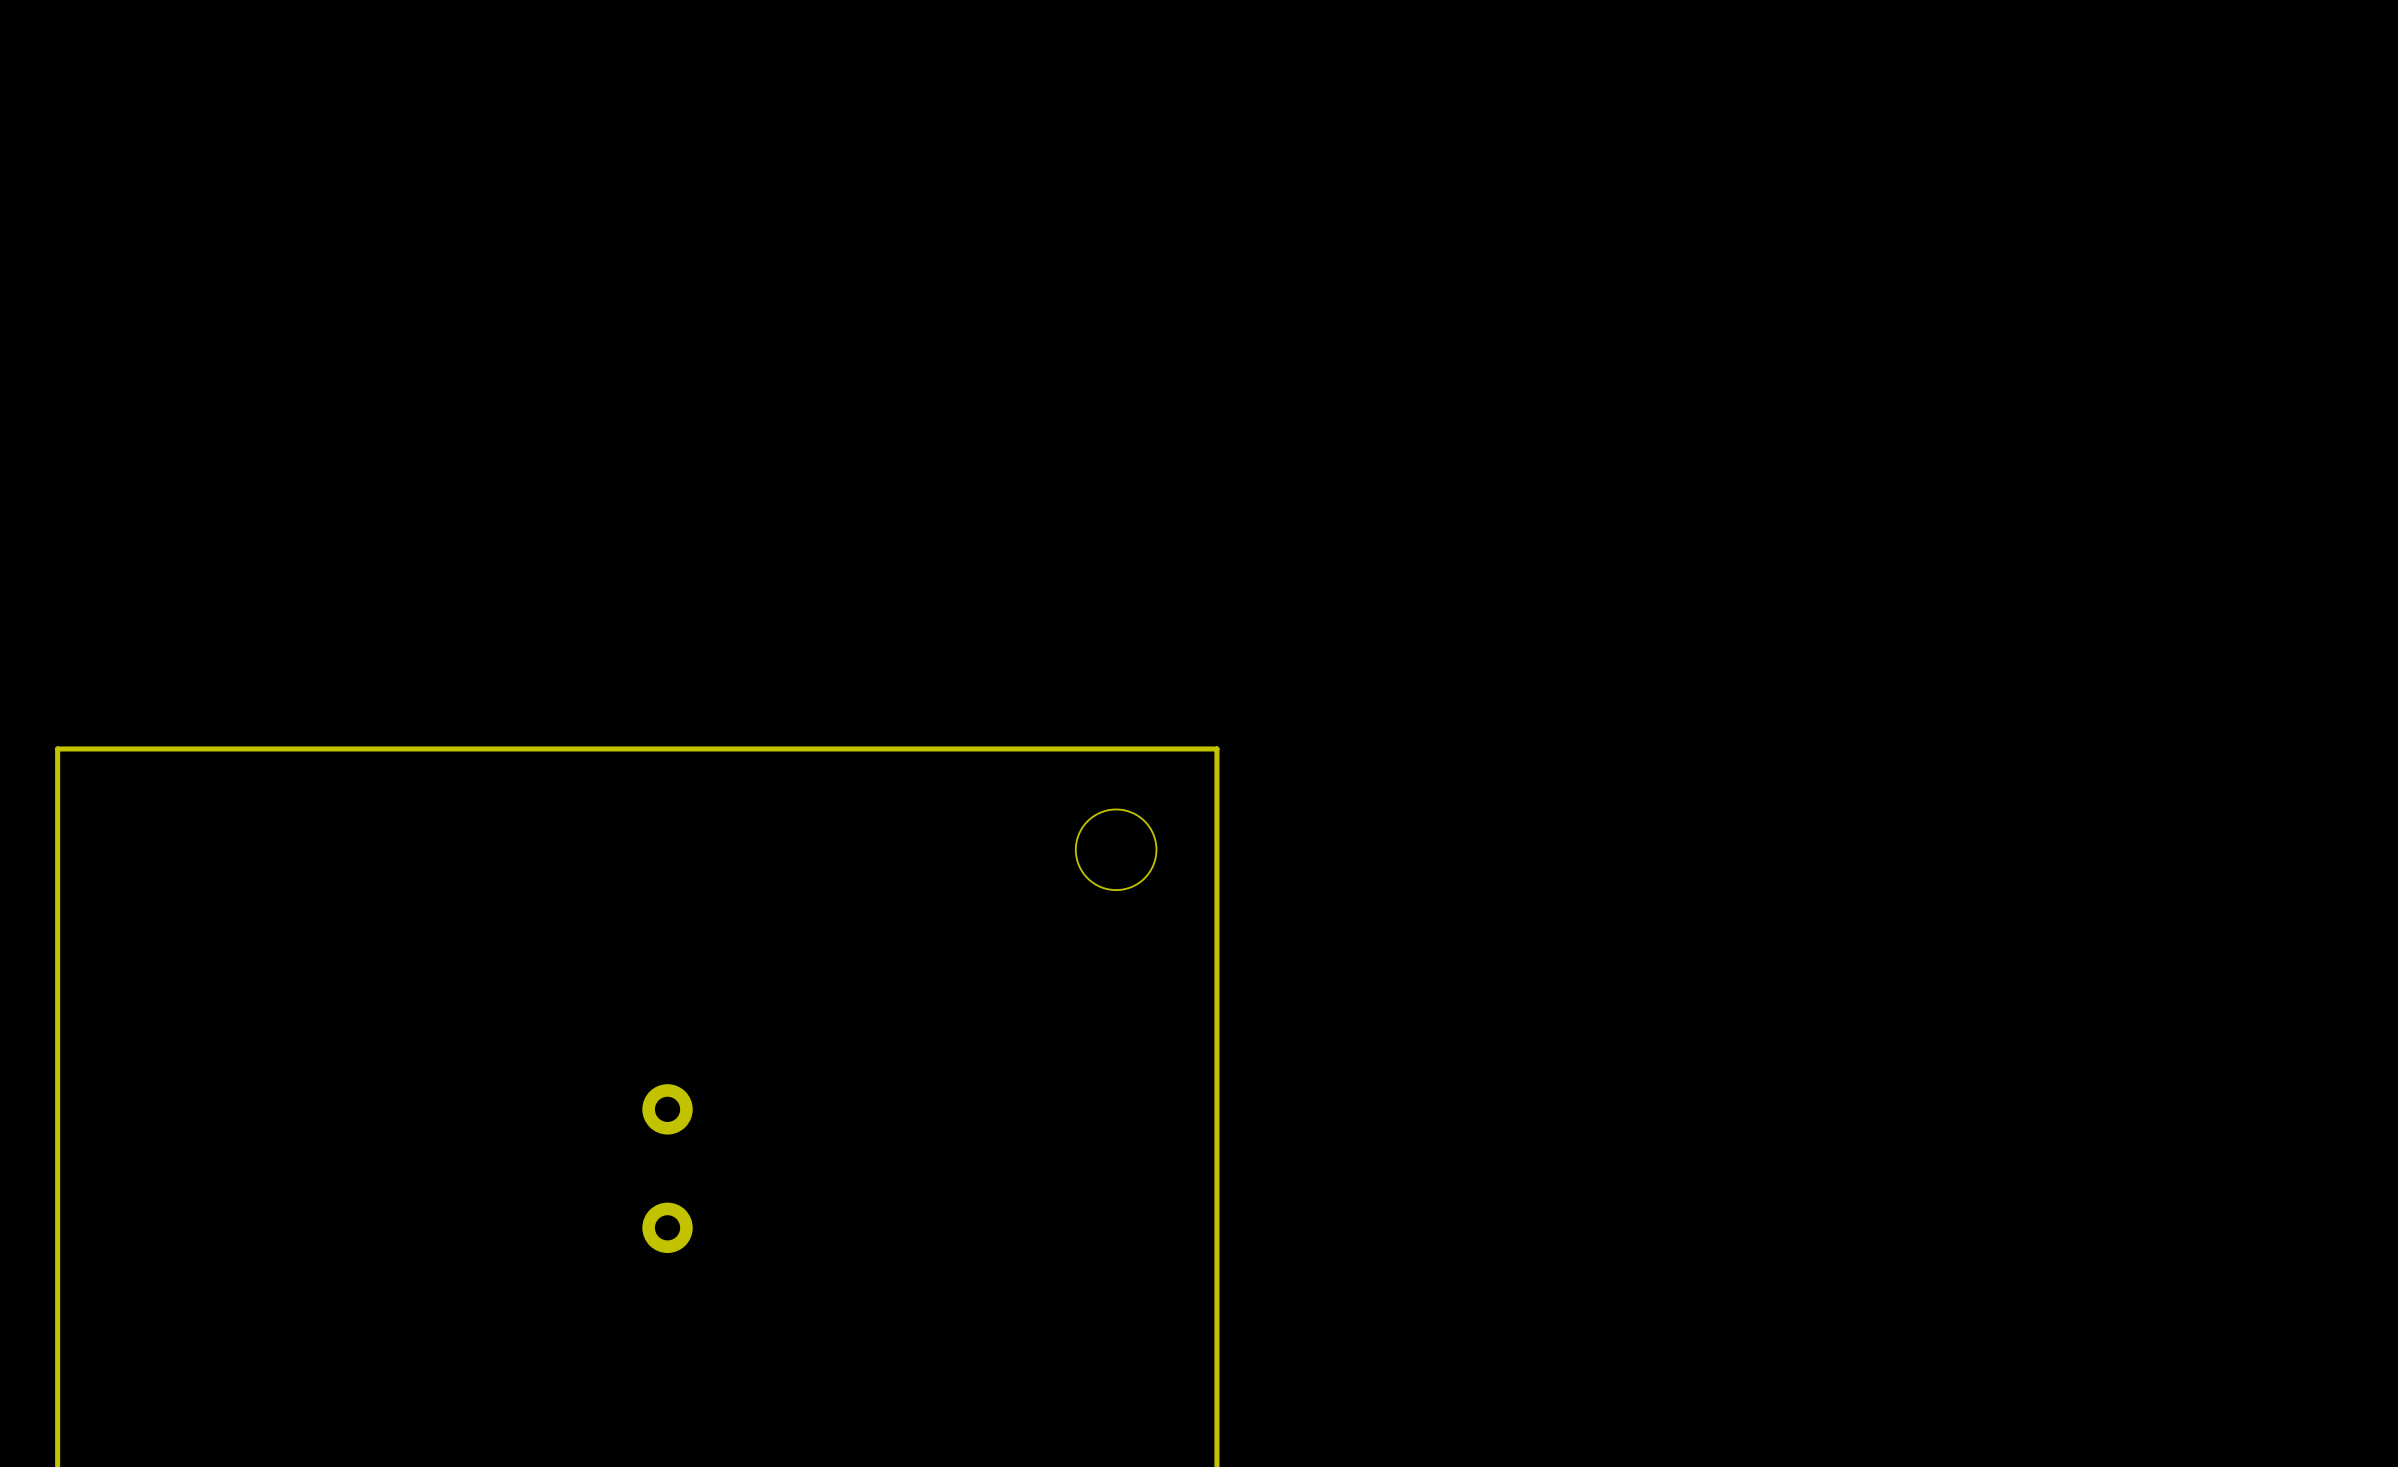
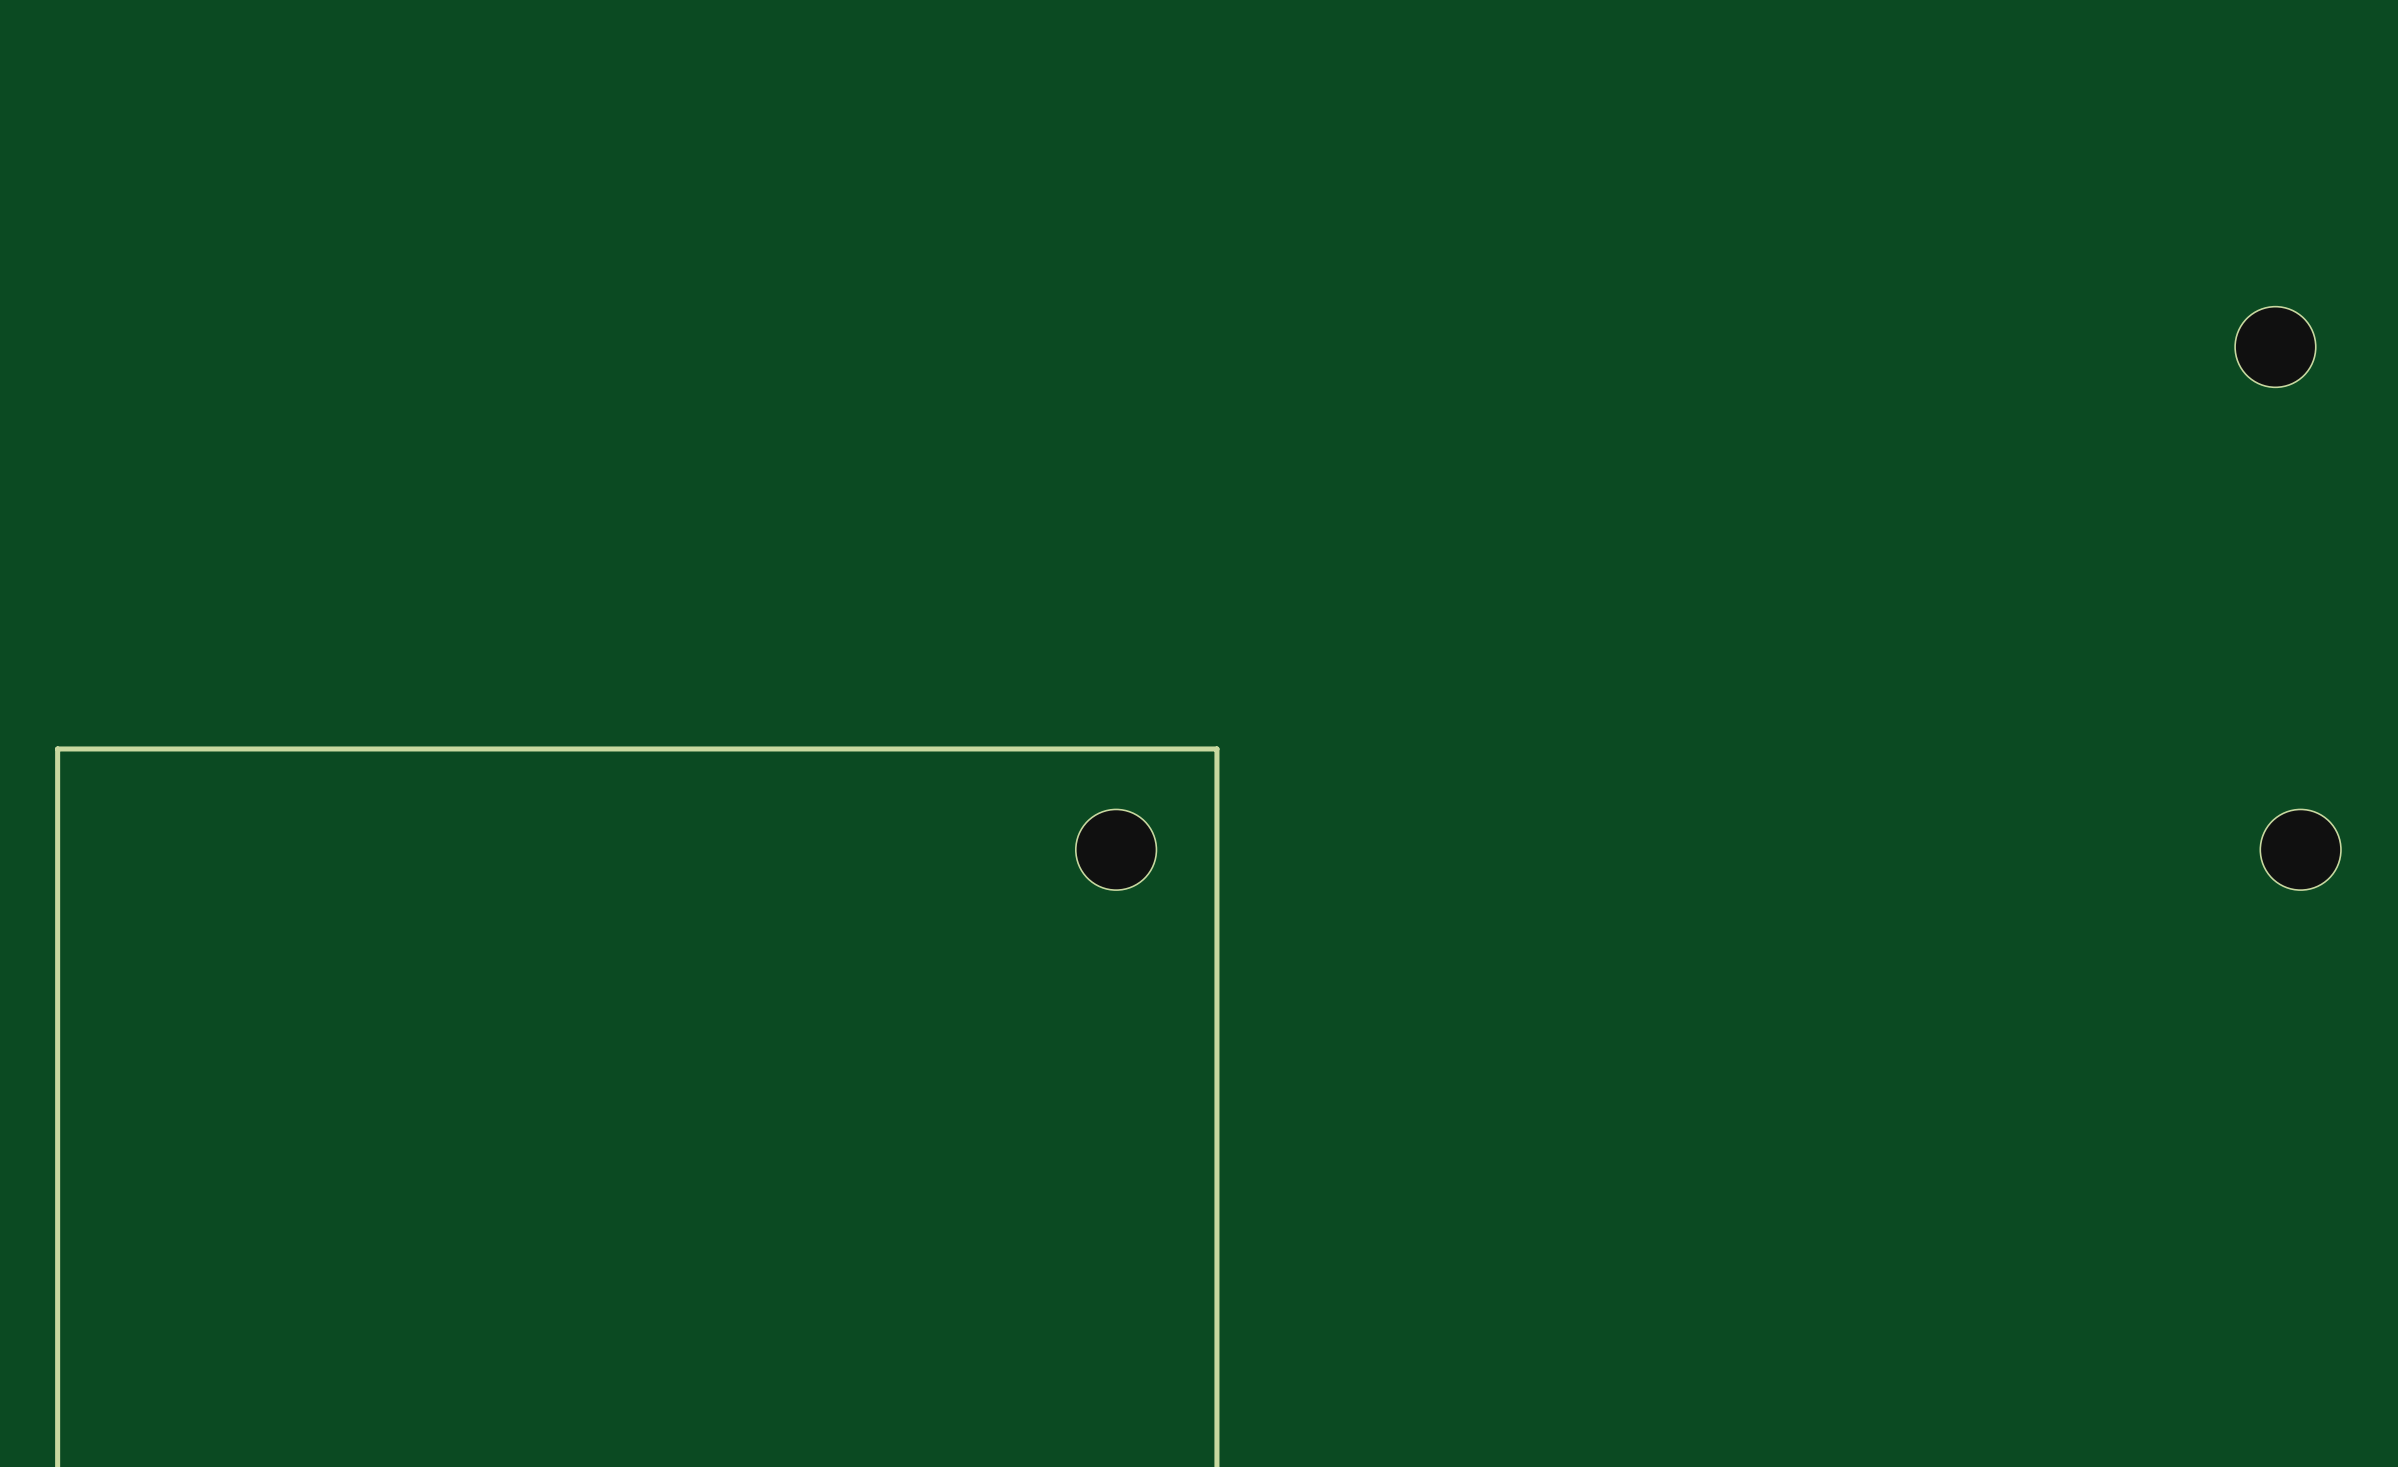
part: none -> (2275, 347)
part: none -> (2300, 849)
part: (667, 1109) -> none
part: (667, 1227) -> none

